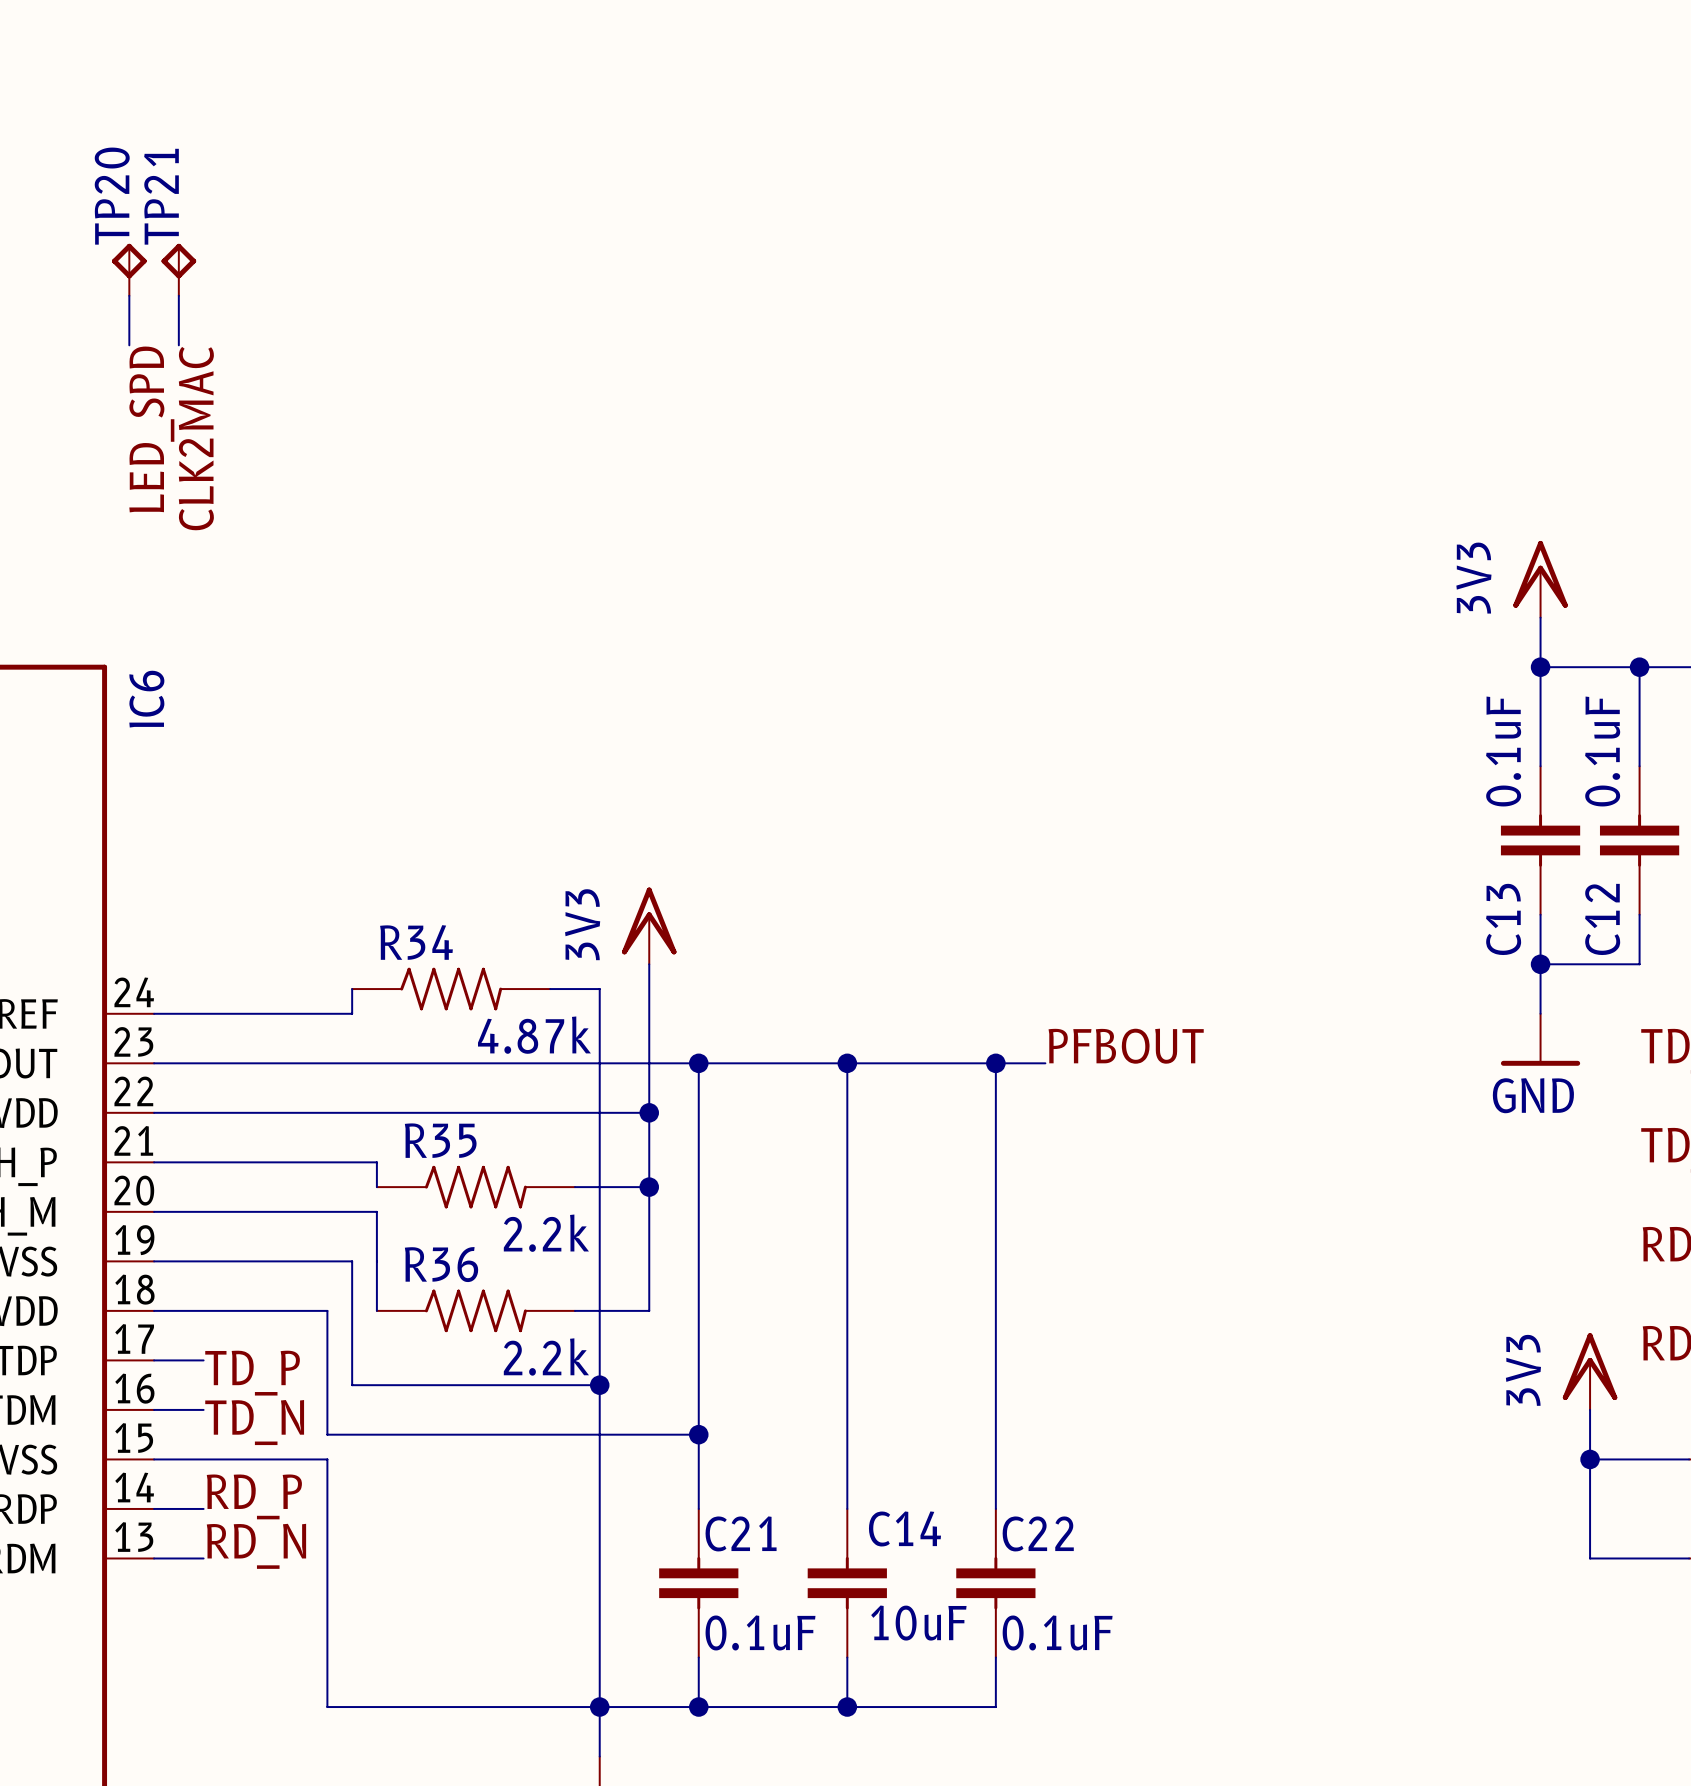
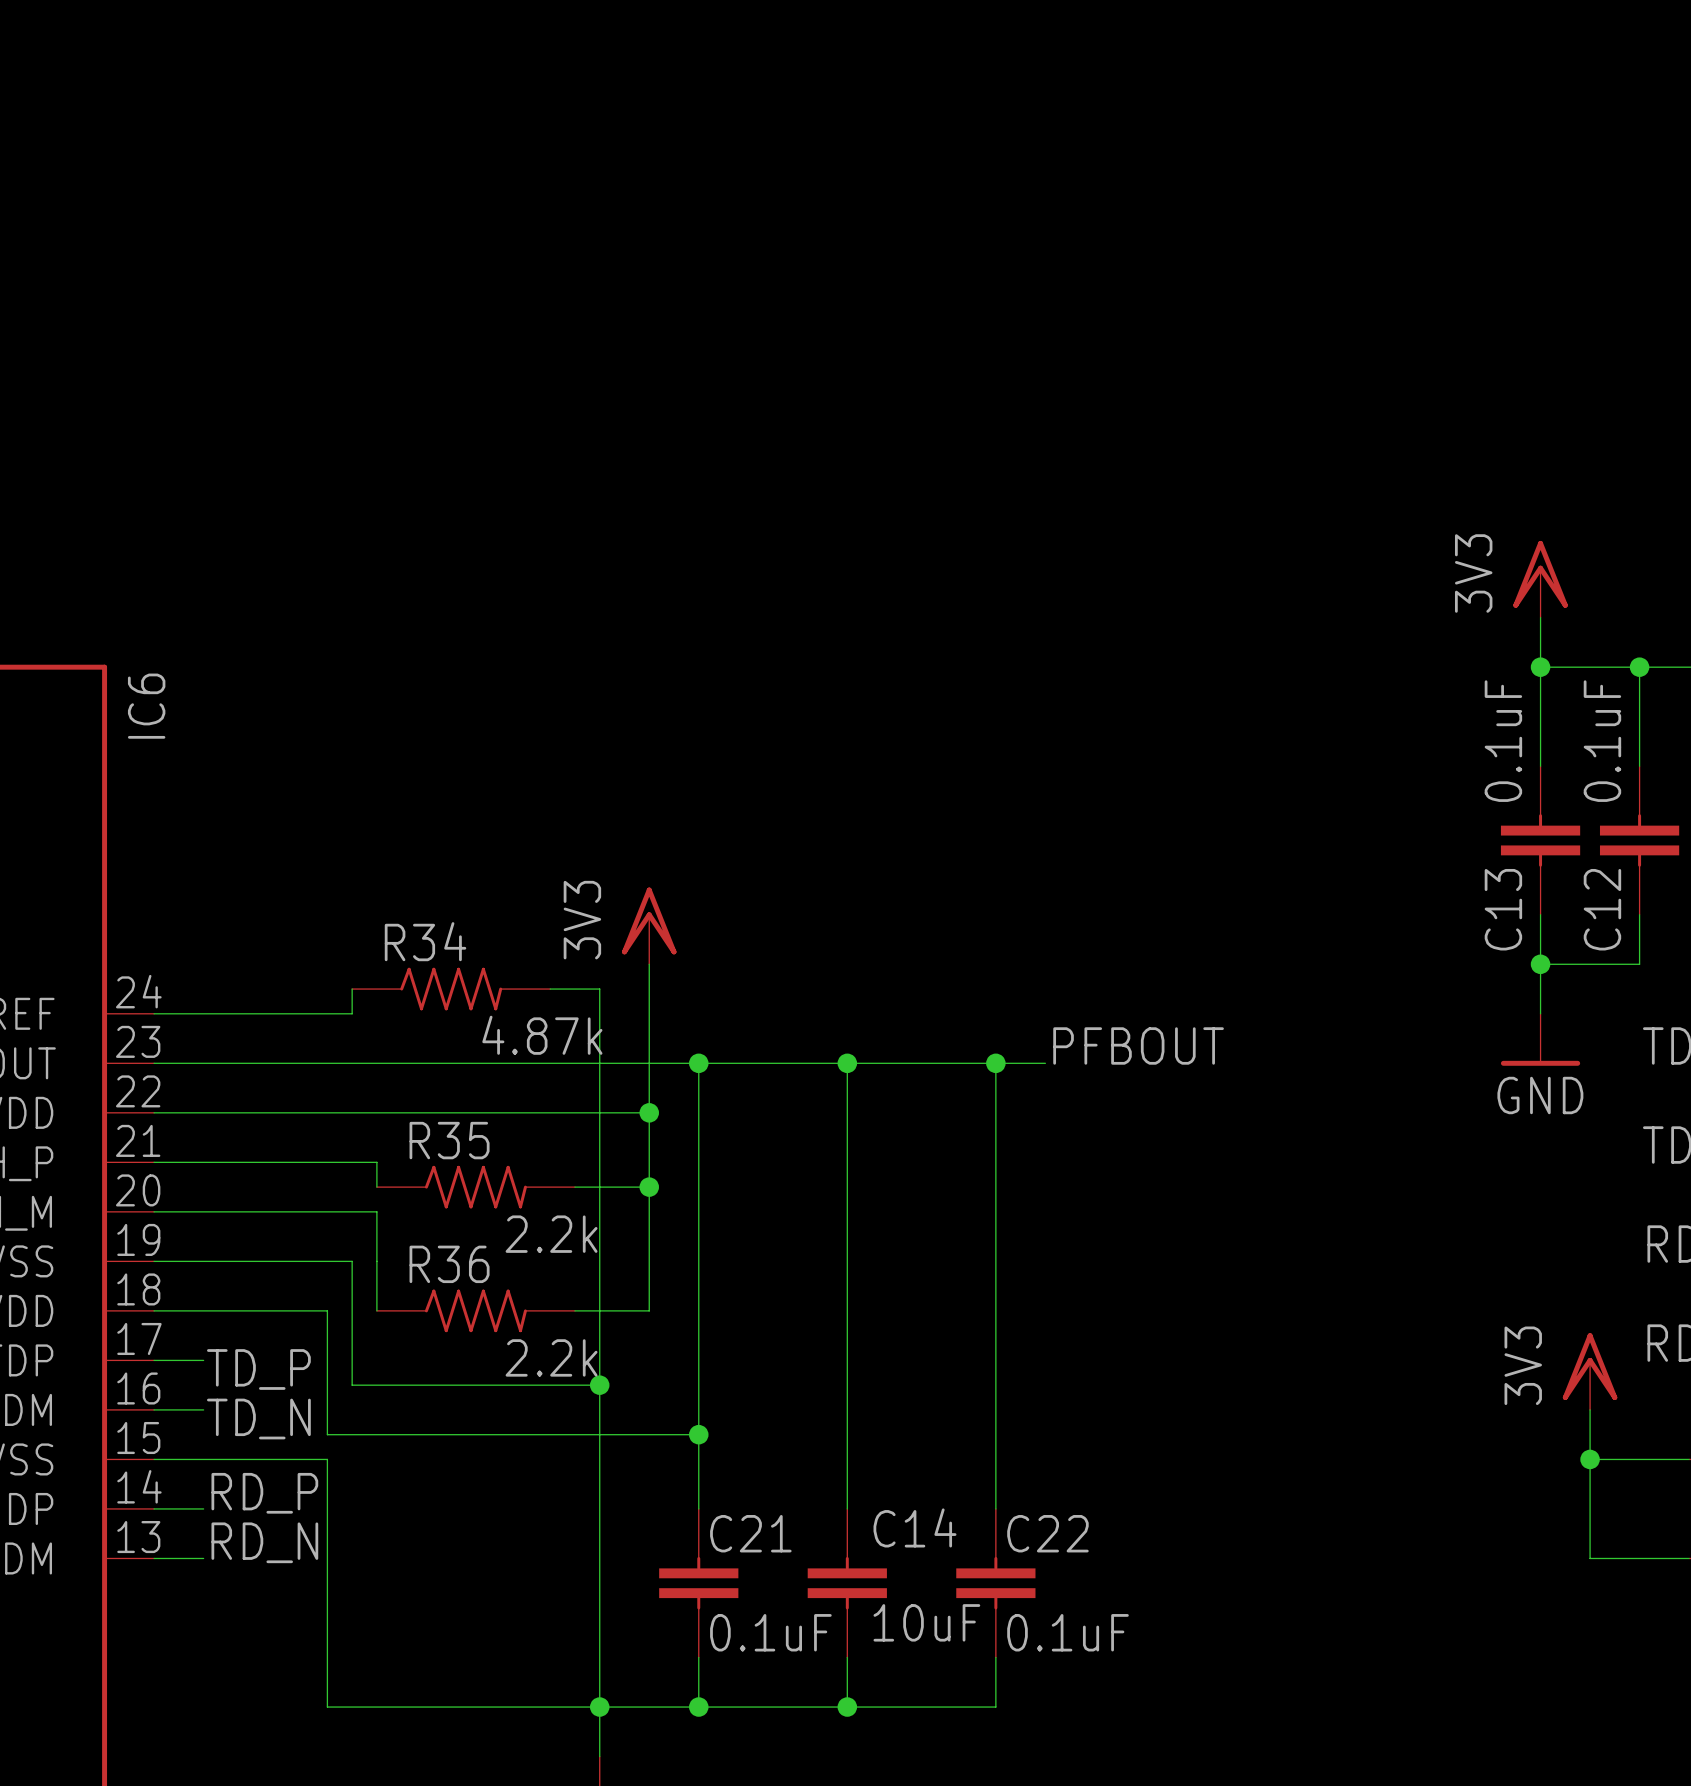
TP20: (129, 269) -> none
TP21: (178, 269) -> none
wire: (129, 295) (129, 345) -> none
wire: (178, 295) (178, 345) -> none
label: LED_SPD (151, 429) -> none
label: CLK2MAC (196, 438) -> none

